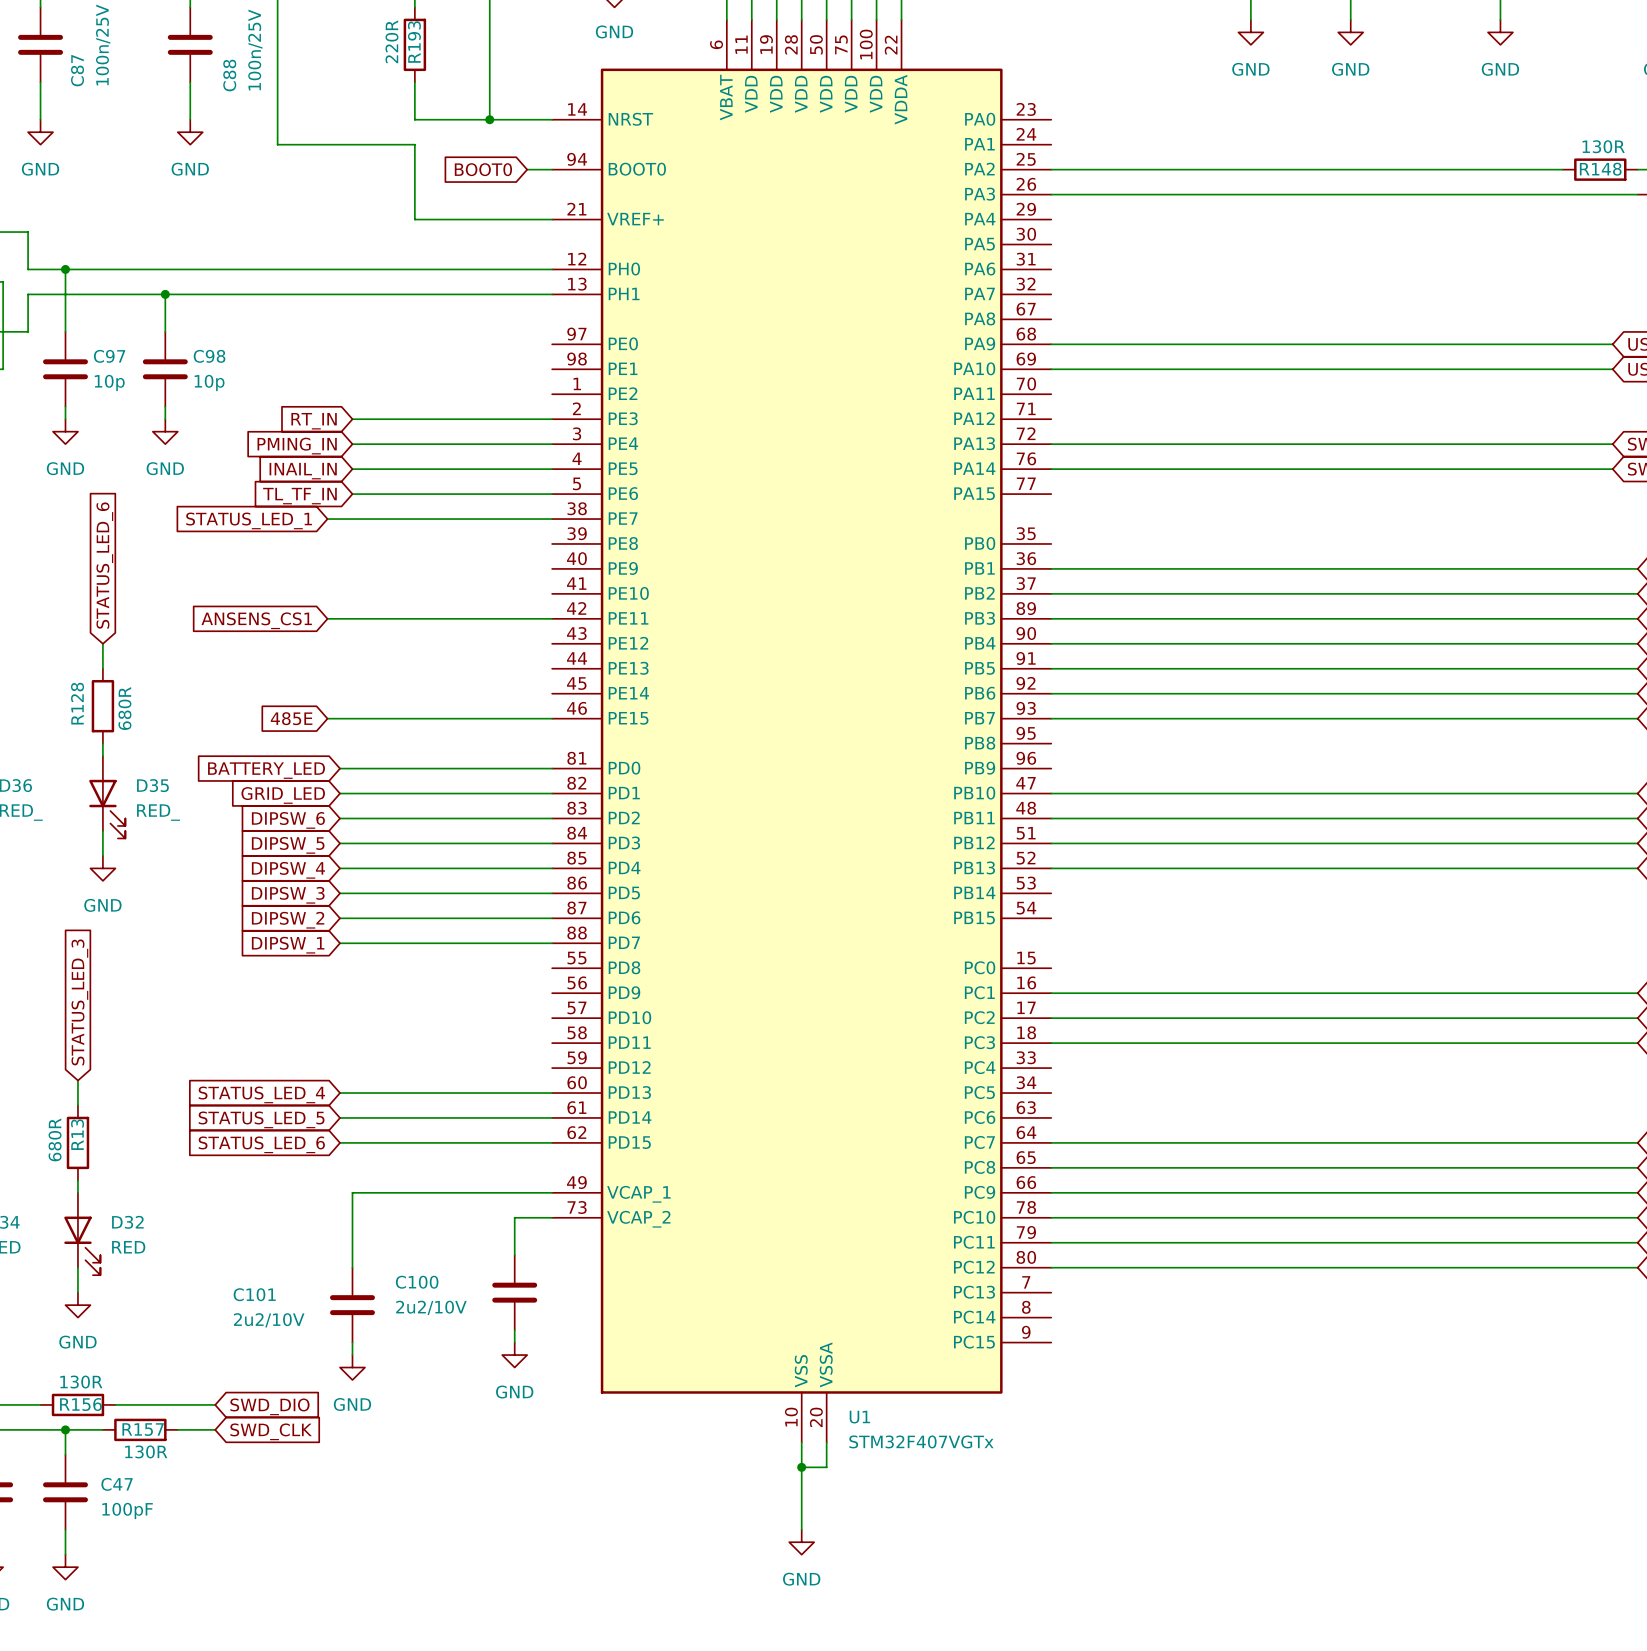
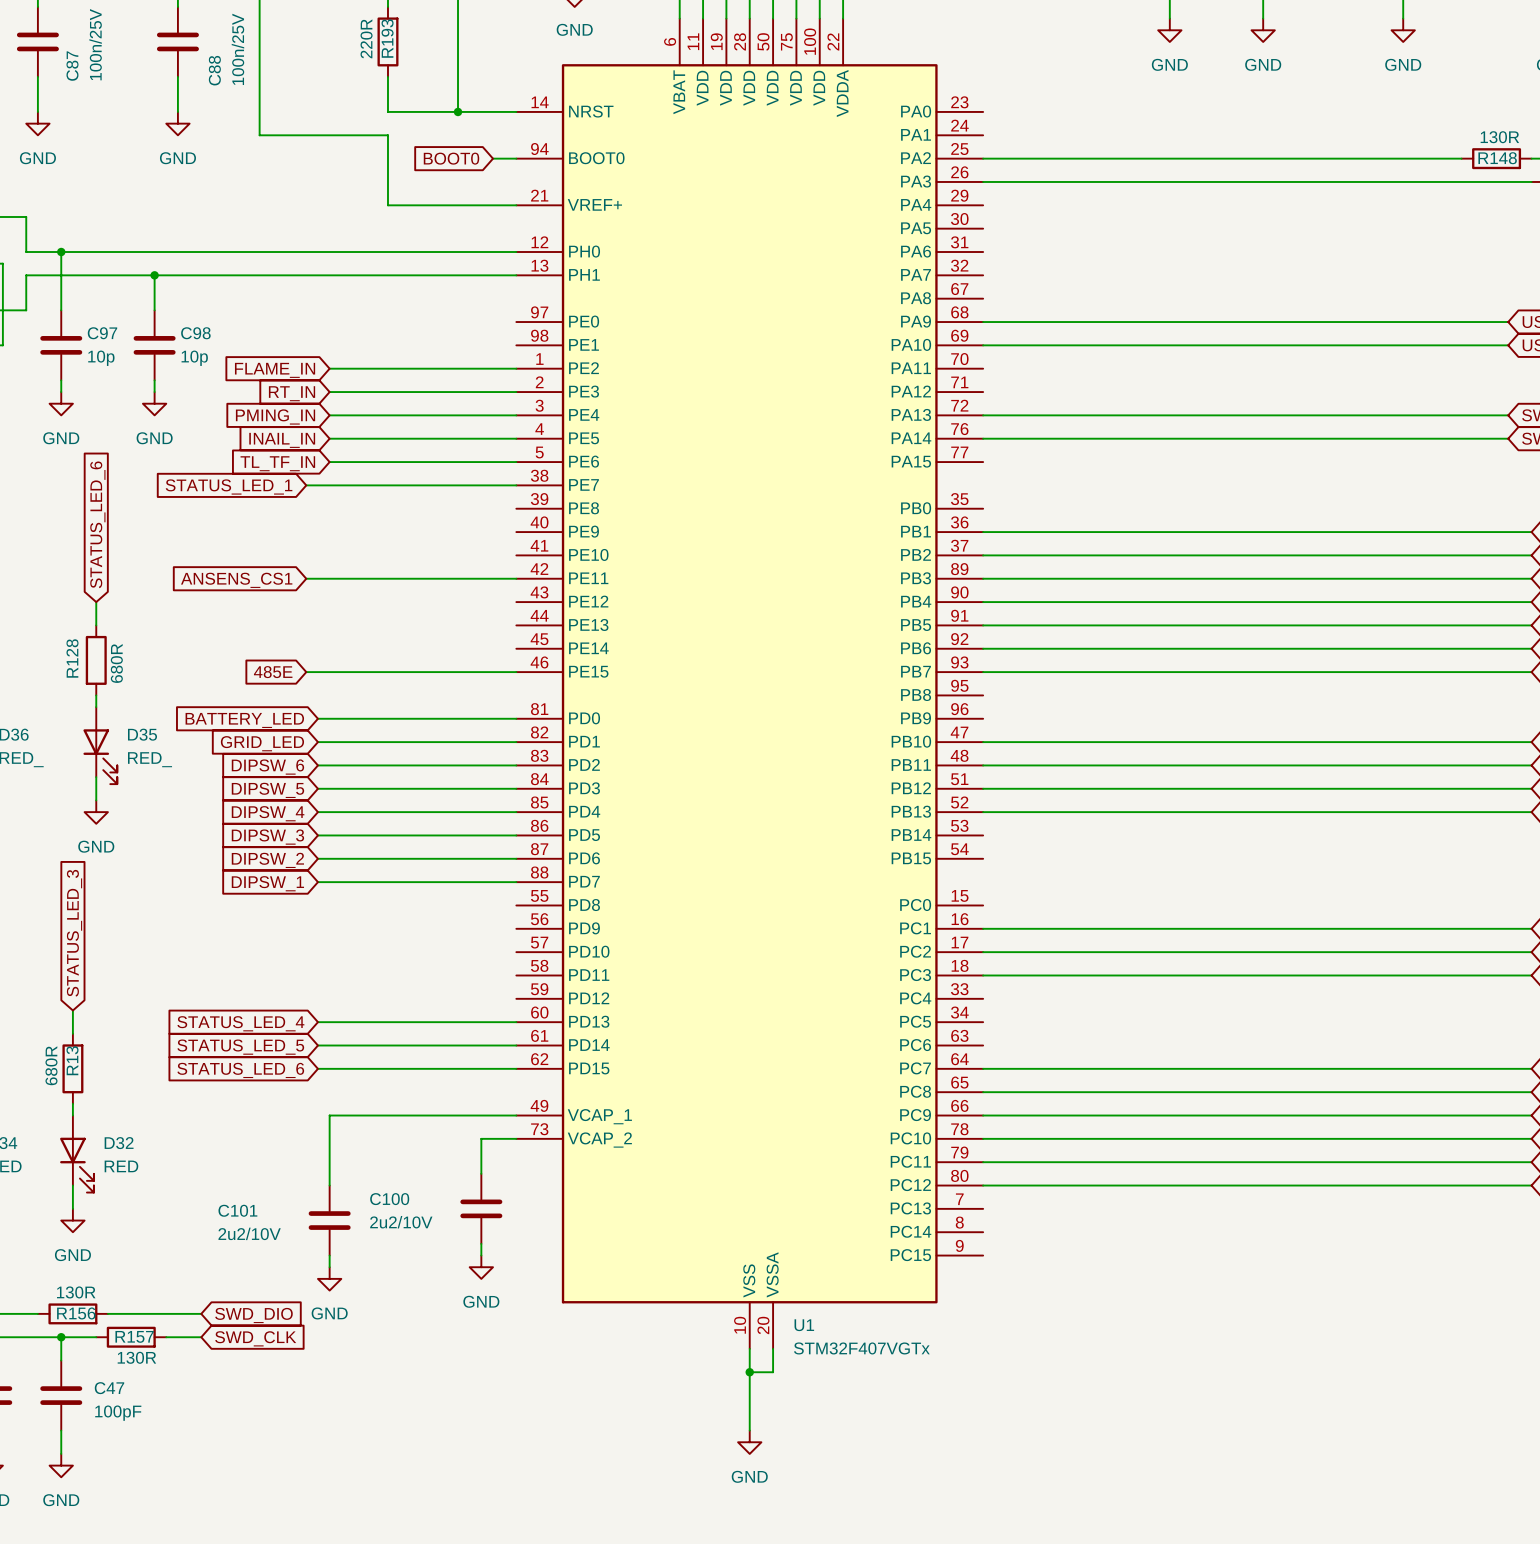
wire: none -> (329, 368) (516, 368)
global label: none -> FLAME_IN (275, 370)

